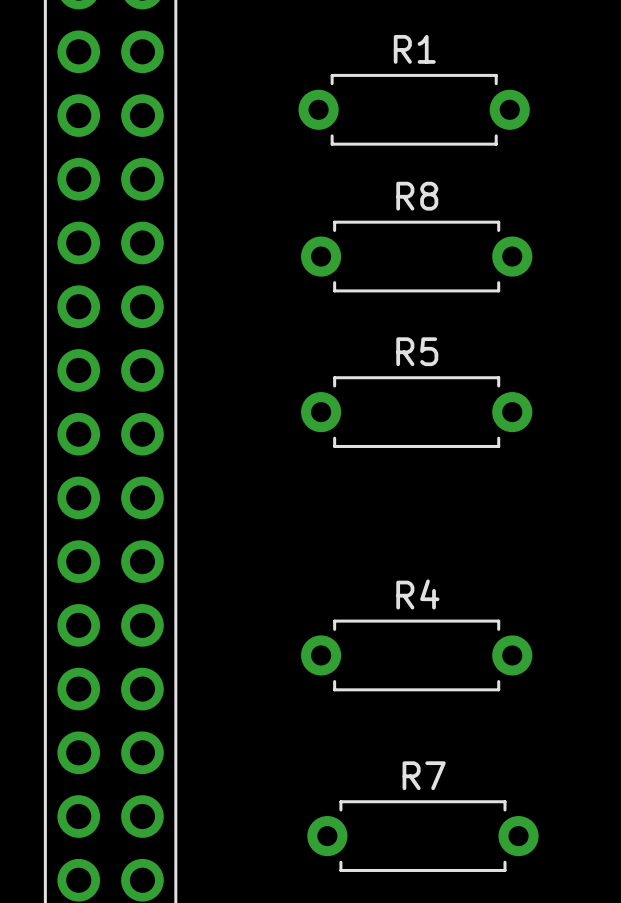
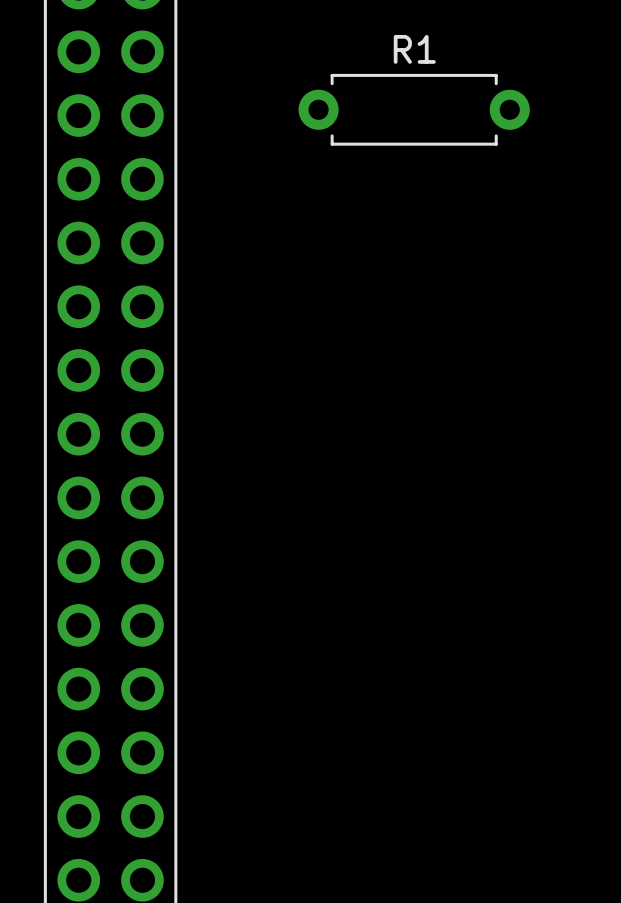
R8: (416, 256) -> none
R5: (416, 412) -> none
R4: (416, 655) -> none
R7: (422, 836) -> none

